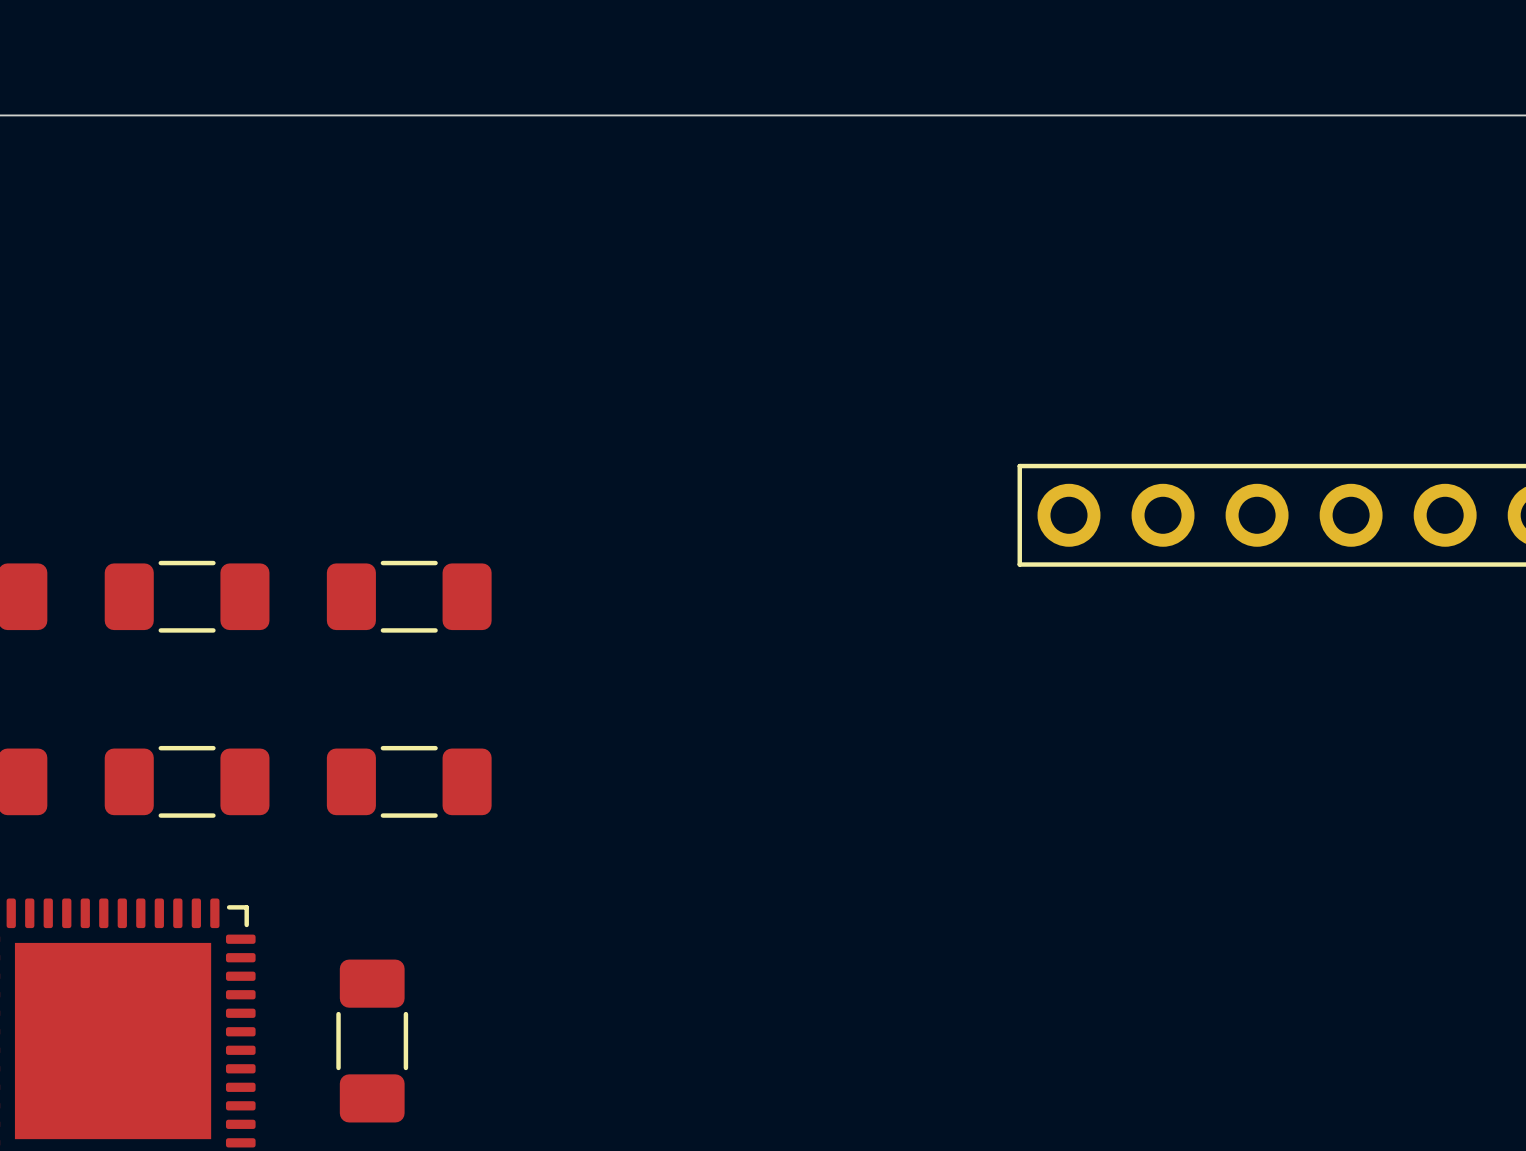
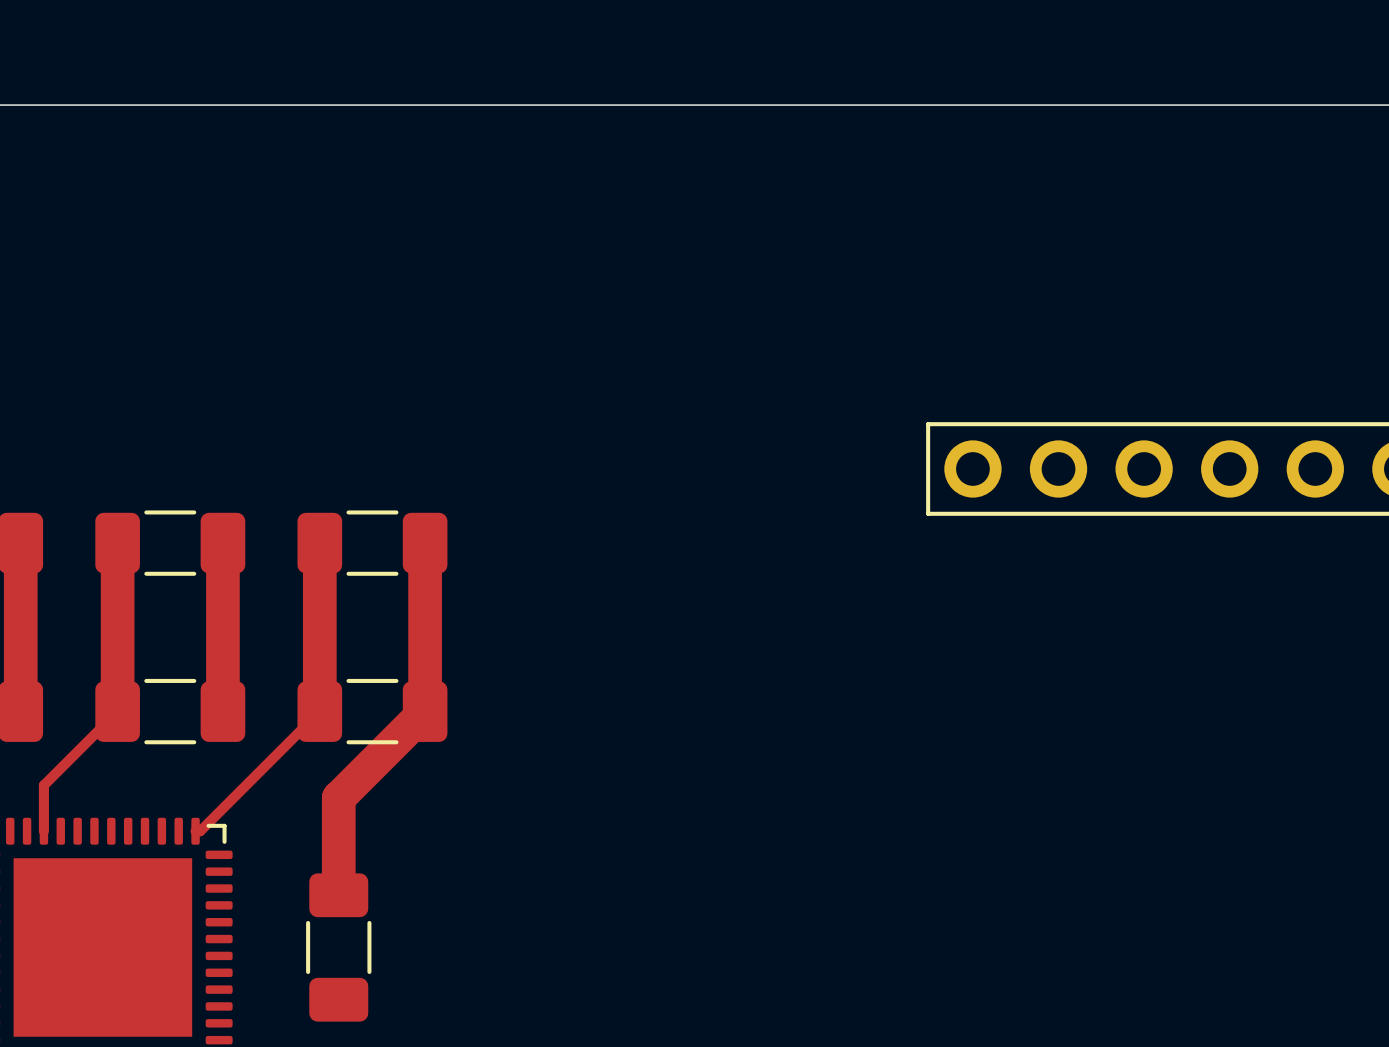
top track: none -> (20, 543) (20, 711)
top track: none -> (117, 543) (117, 711) (43, 785) (43, 831)
top track: none -> (222, 543) (222, 711)
top track: none -> (319, 543) (319, 711) (200, 831) (195, 831)
top track: none -> (425, 543) (425, 711) (338, 797) (338, 895)

